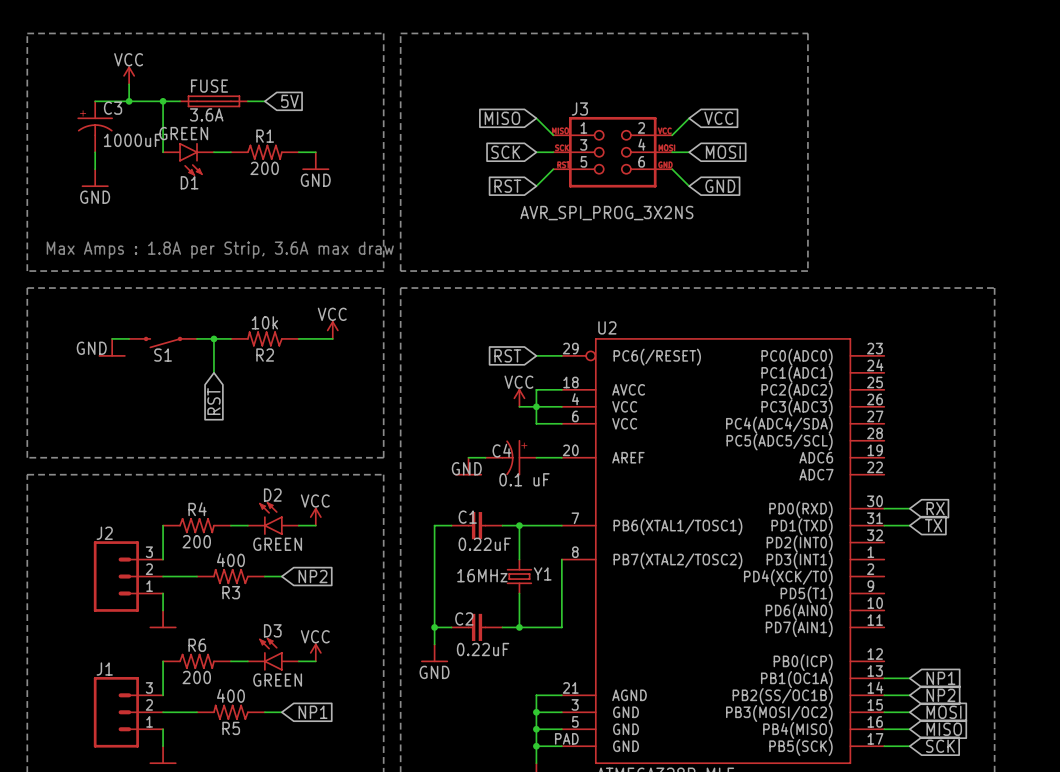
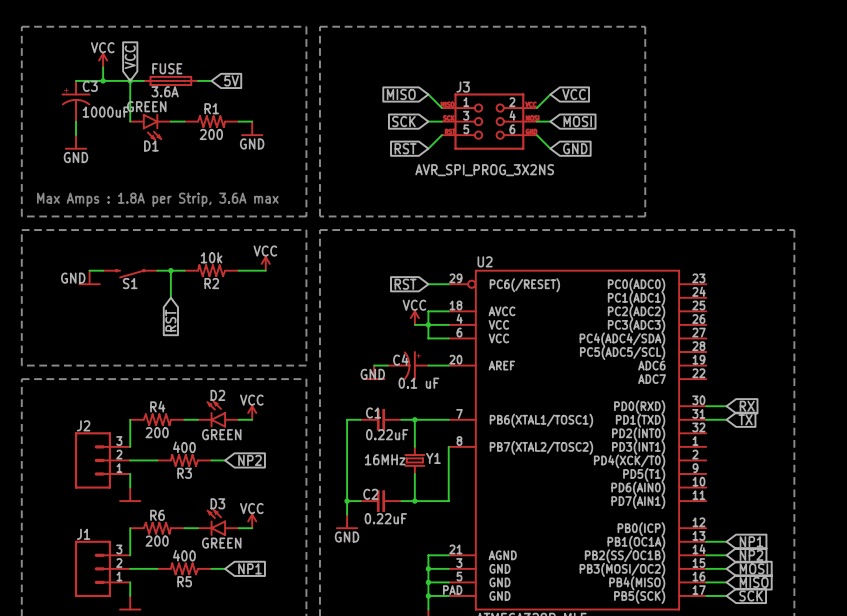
global label: none -> VCC (130, 57)
text: Max Amps : 1.8A per Strip, 3.6A max draw (220, 250) -> Max Amps : 1.8A per Strip, 3.6A max (157, 199)

